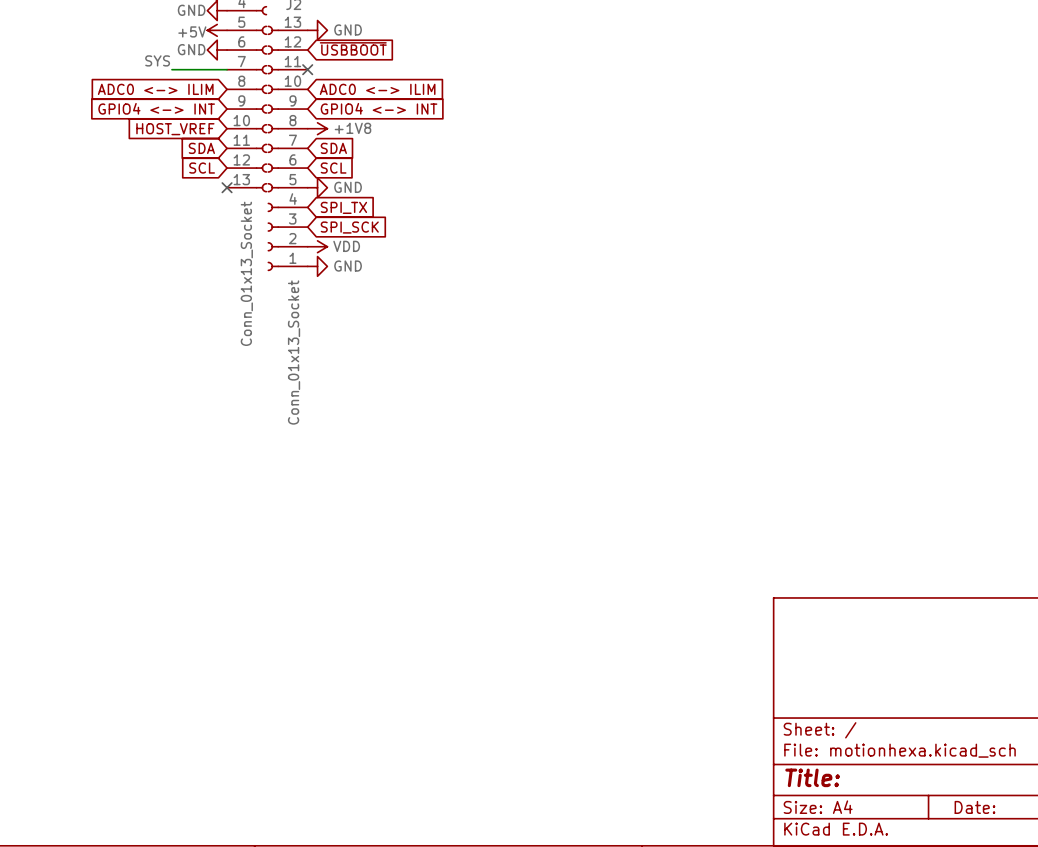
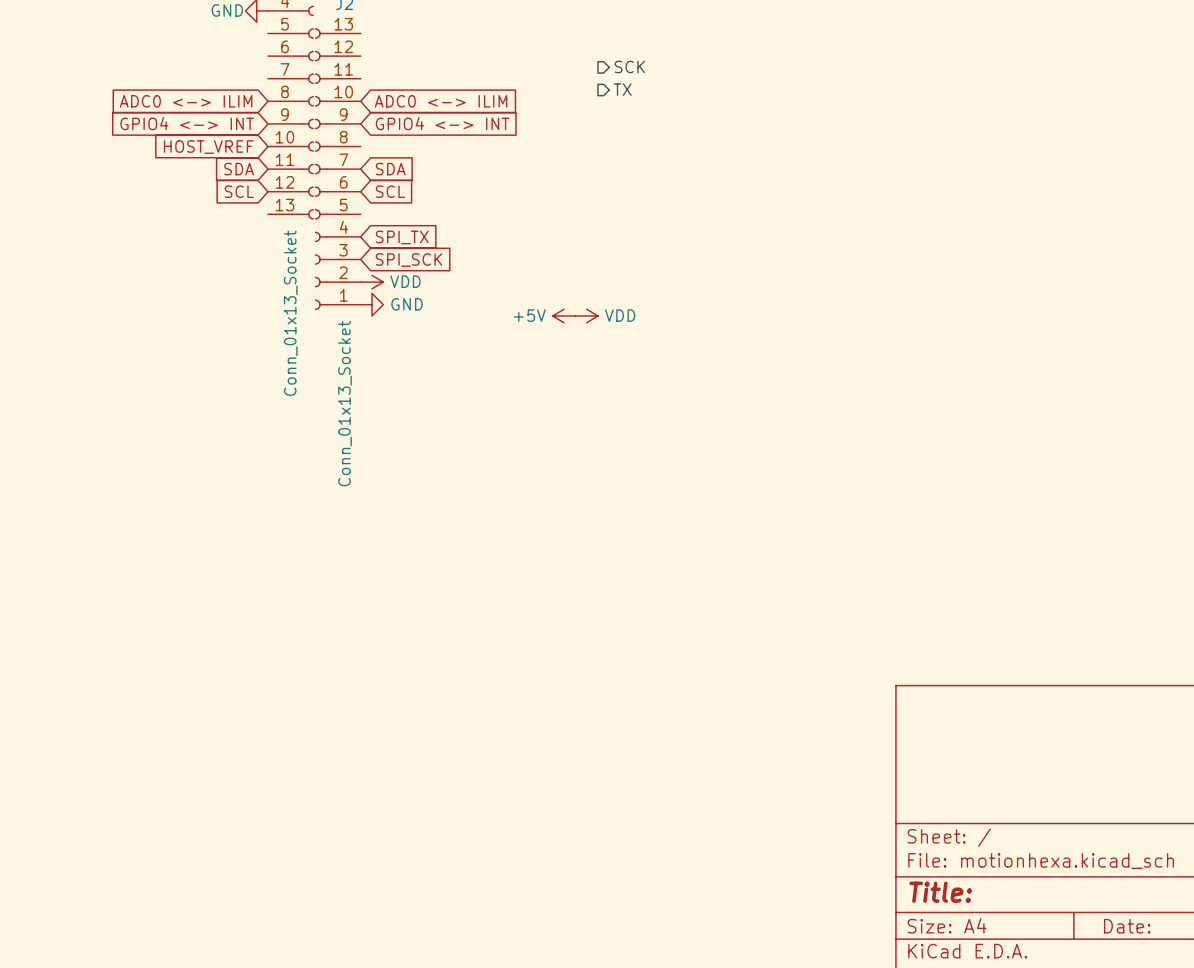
power symbol: +5V (217, 30) -> none
power symbol: GND (317, 30) -> none
global label: ~{USBBOOT} (353, 48) -> none
power symbol: GND (217, 50) -> none
sheet pin: none -> SCK (629, 66)
label: SYS (157, 60) -> none
wire: (171, 69) (227, 69) -> none
no-connect mark: (307, 69) -> none
sheet pin: none -> TX (622, 89)
power symbol: +1V8 (317, 128) -> none
no-connect mark: (227, 187) -> none
power symbol: GND (317, 187) -> none
power symbol: none -> +5V (564, 316)
power symbol: none -> VDD (586, 316)

